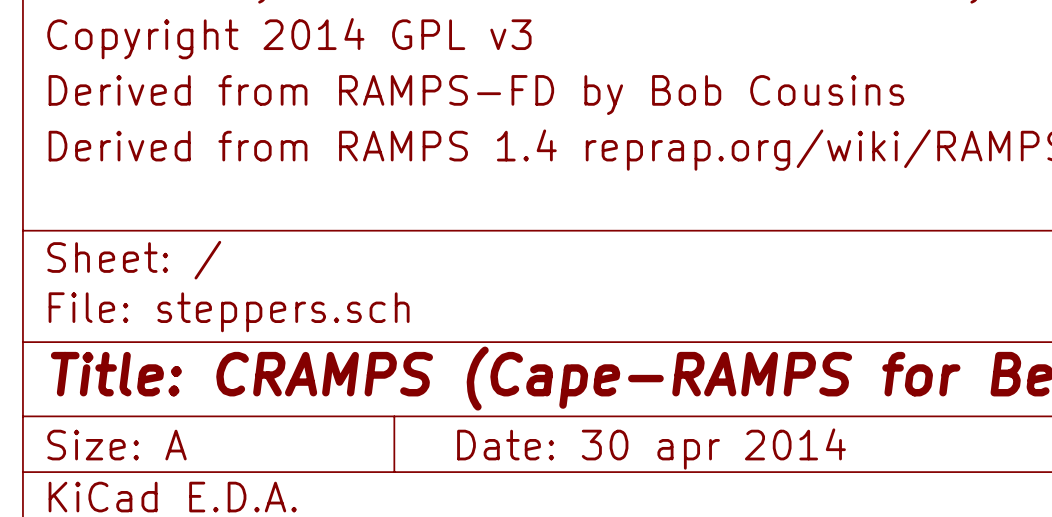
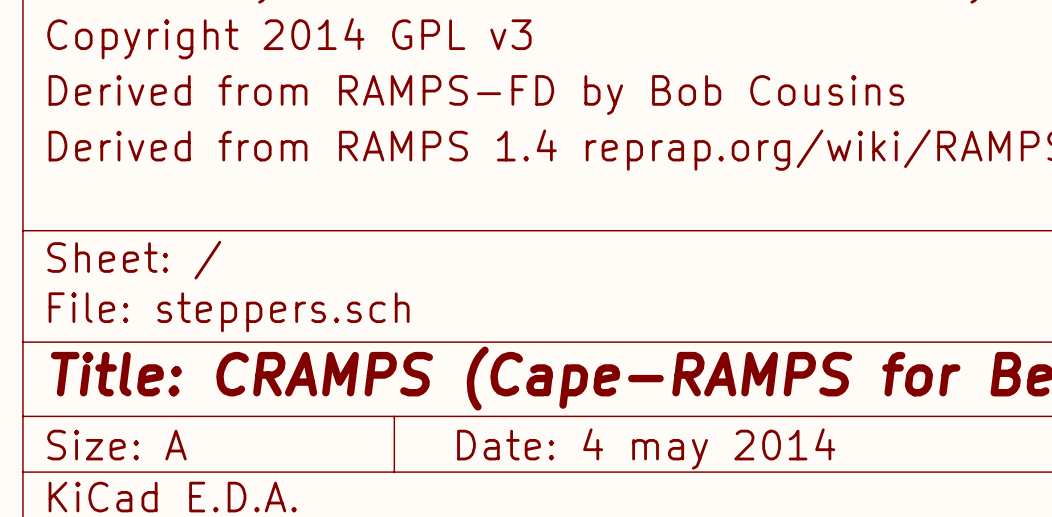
title block: Date: 30 apr 2014 (651, 449) -> Date: 4 may 2014 (646, 449)

